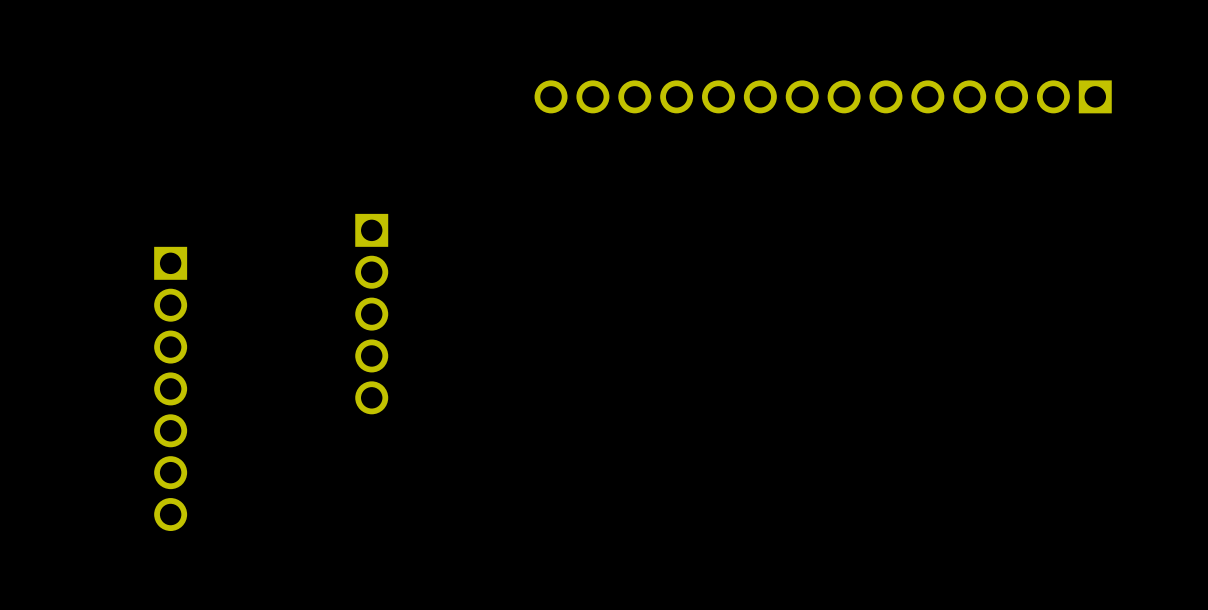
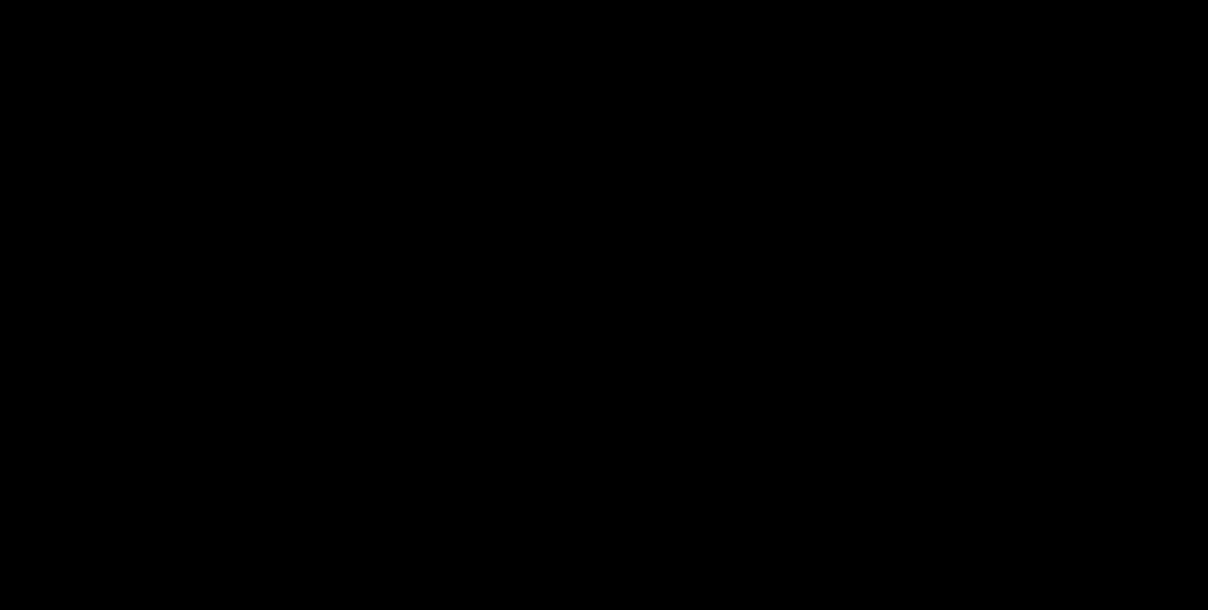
part: (823, 96) -> none
part: (371, 314) -> none
part: (170, 388) -> none

